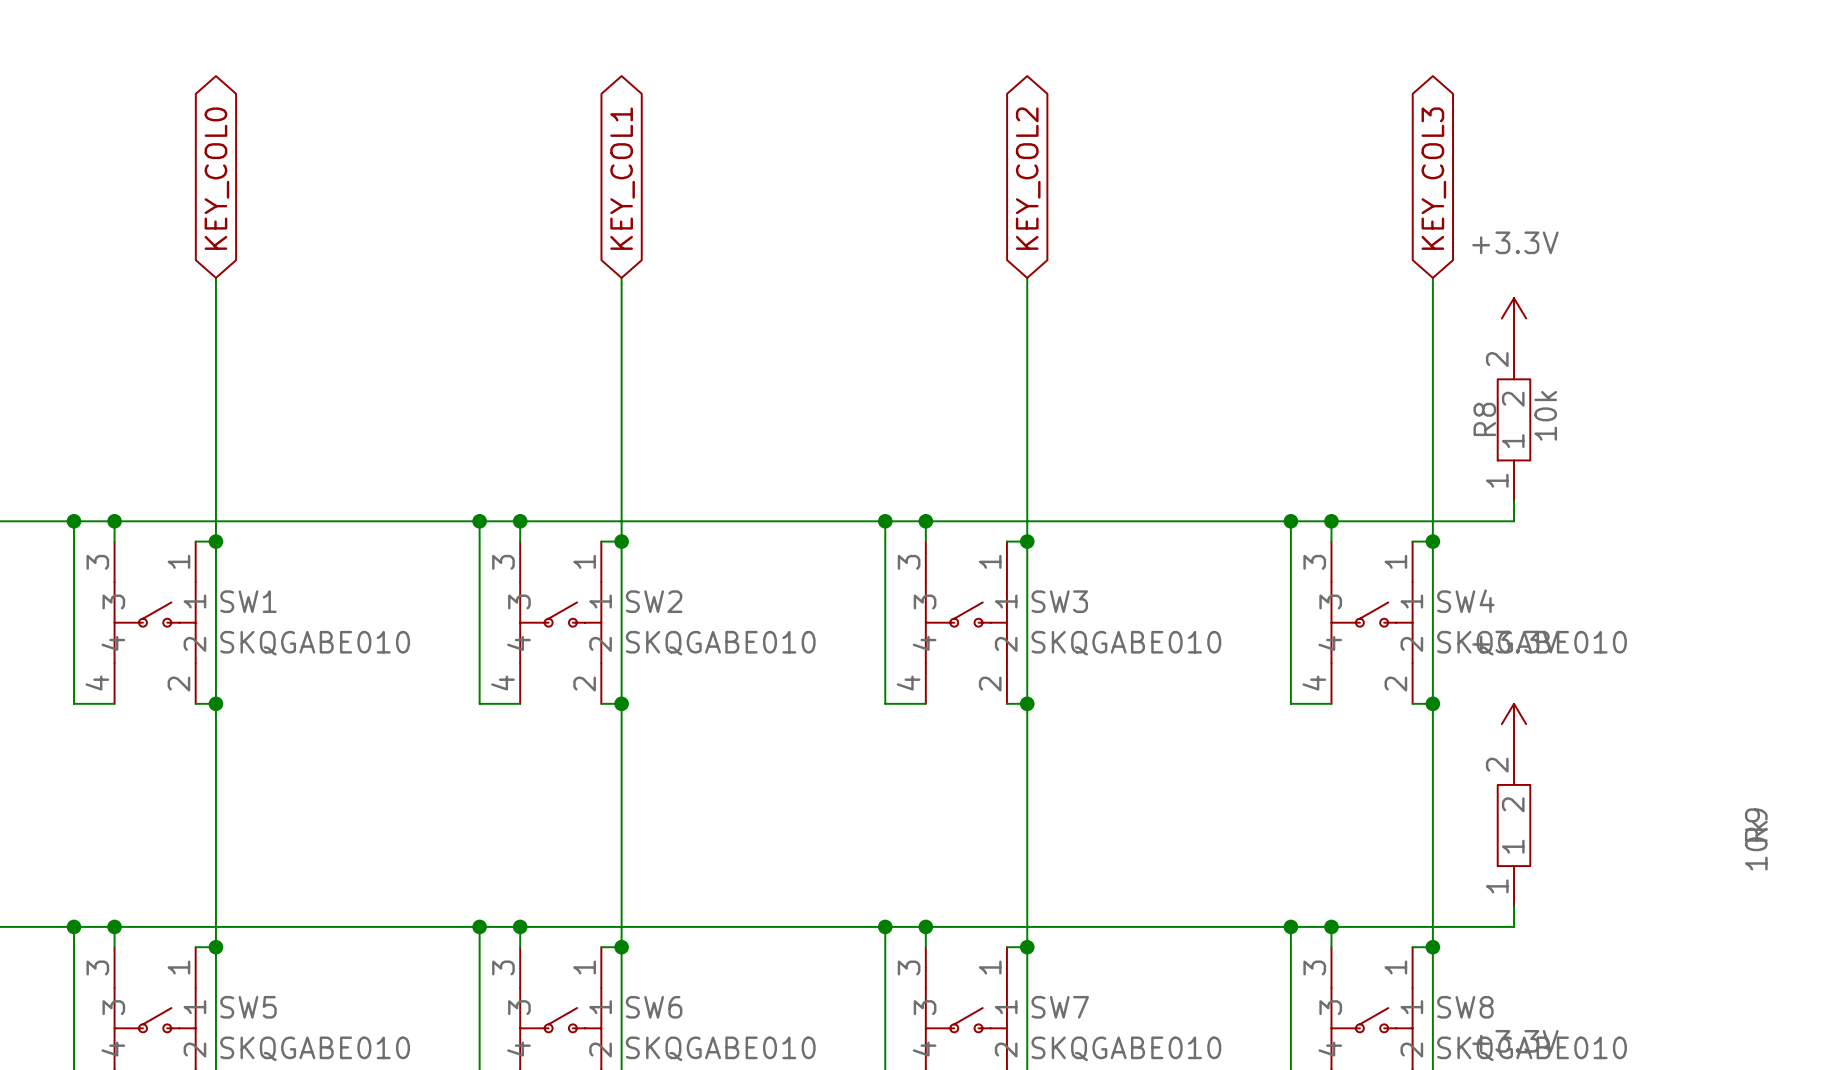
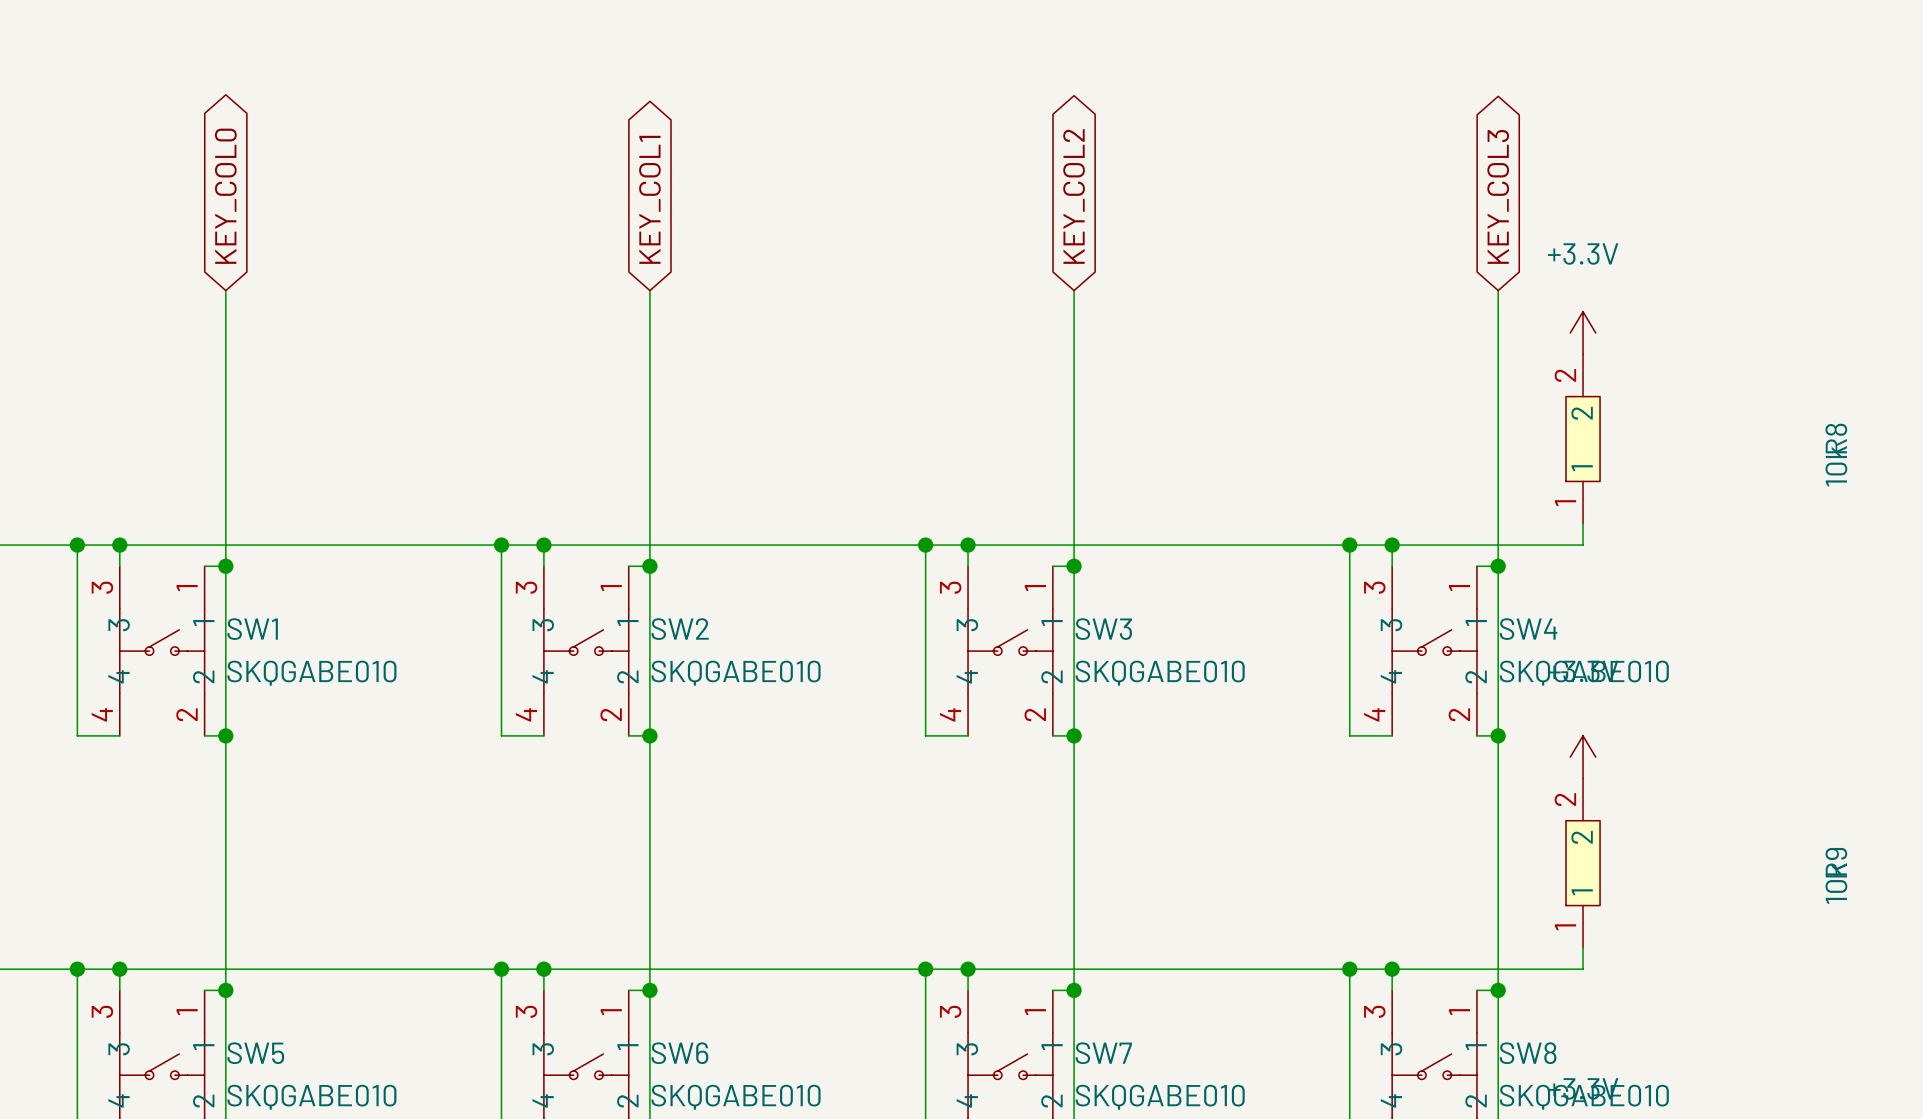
R8 value position: 10k (1545, 415) -> 10k (1836, 466)
R8 name position: R8 (1484, 419) -> R8 (1836, 438)

